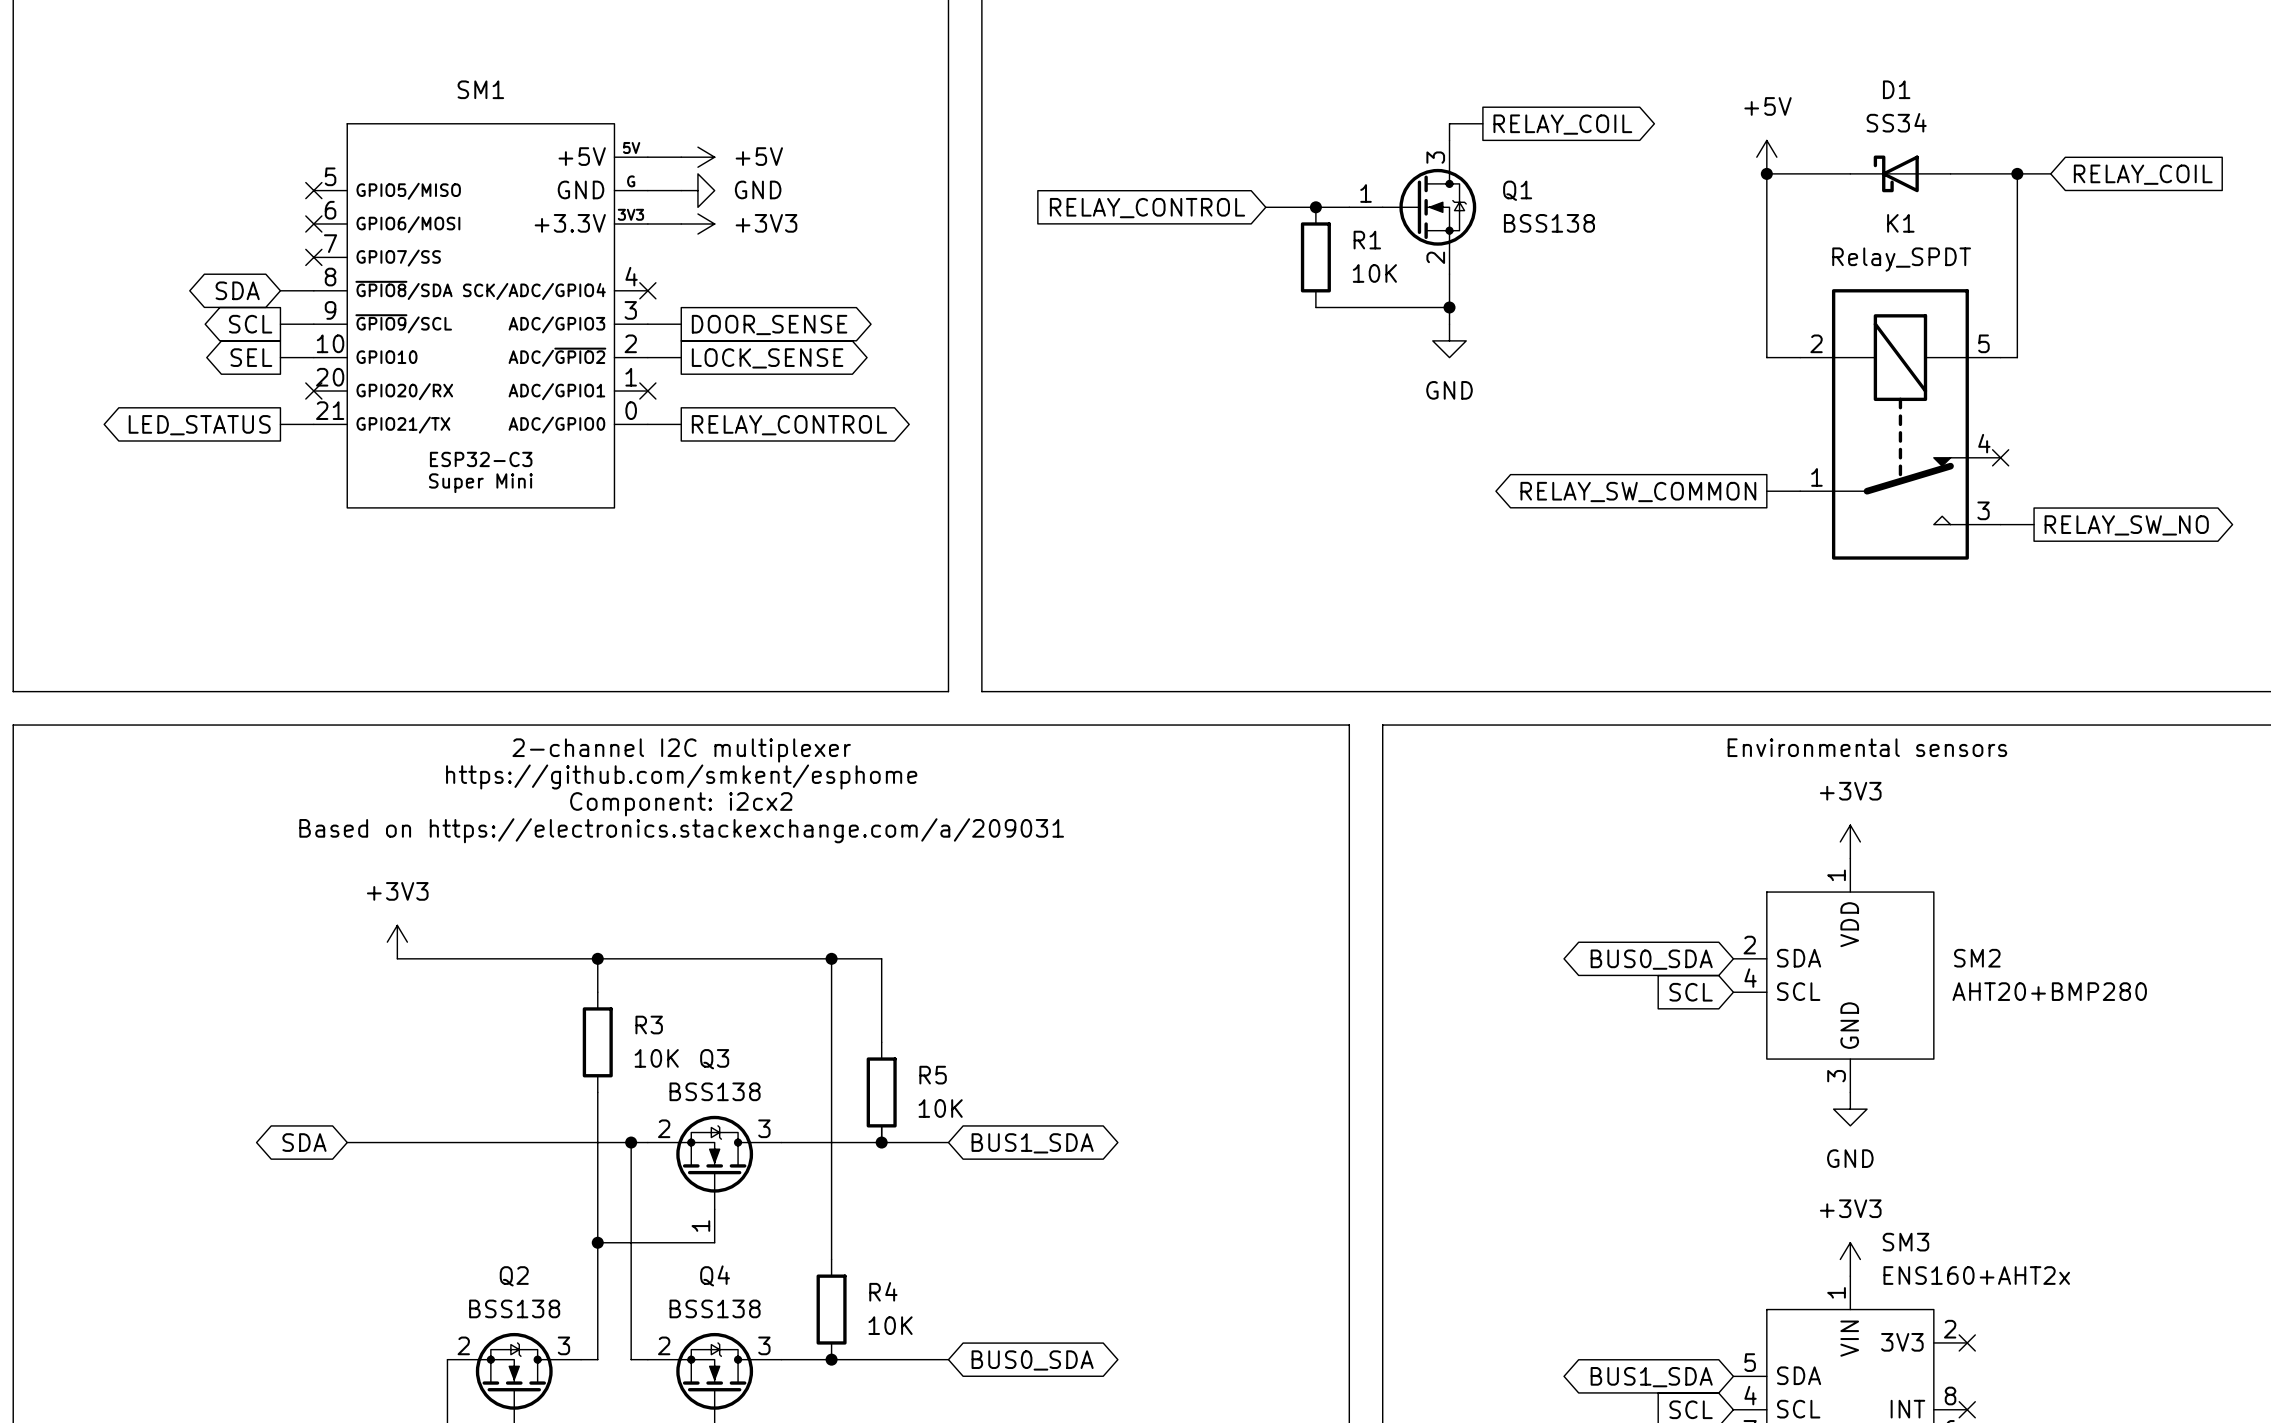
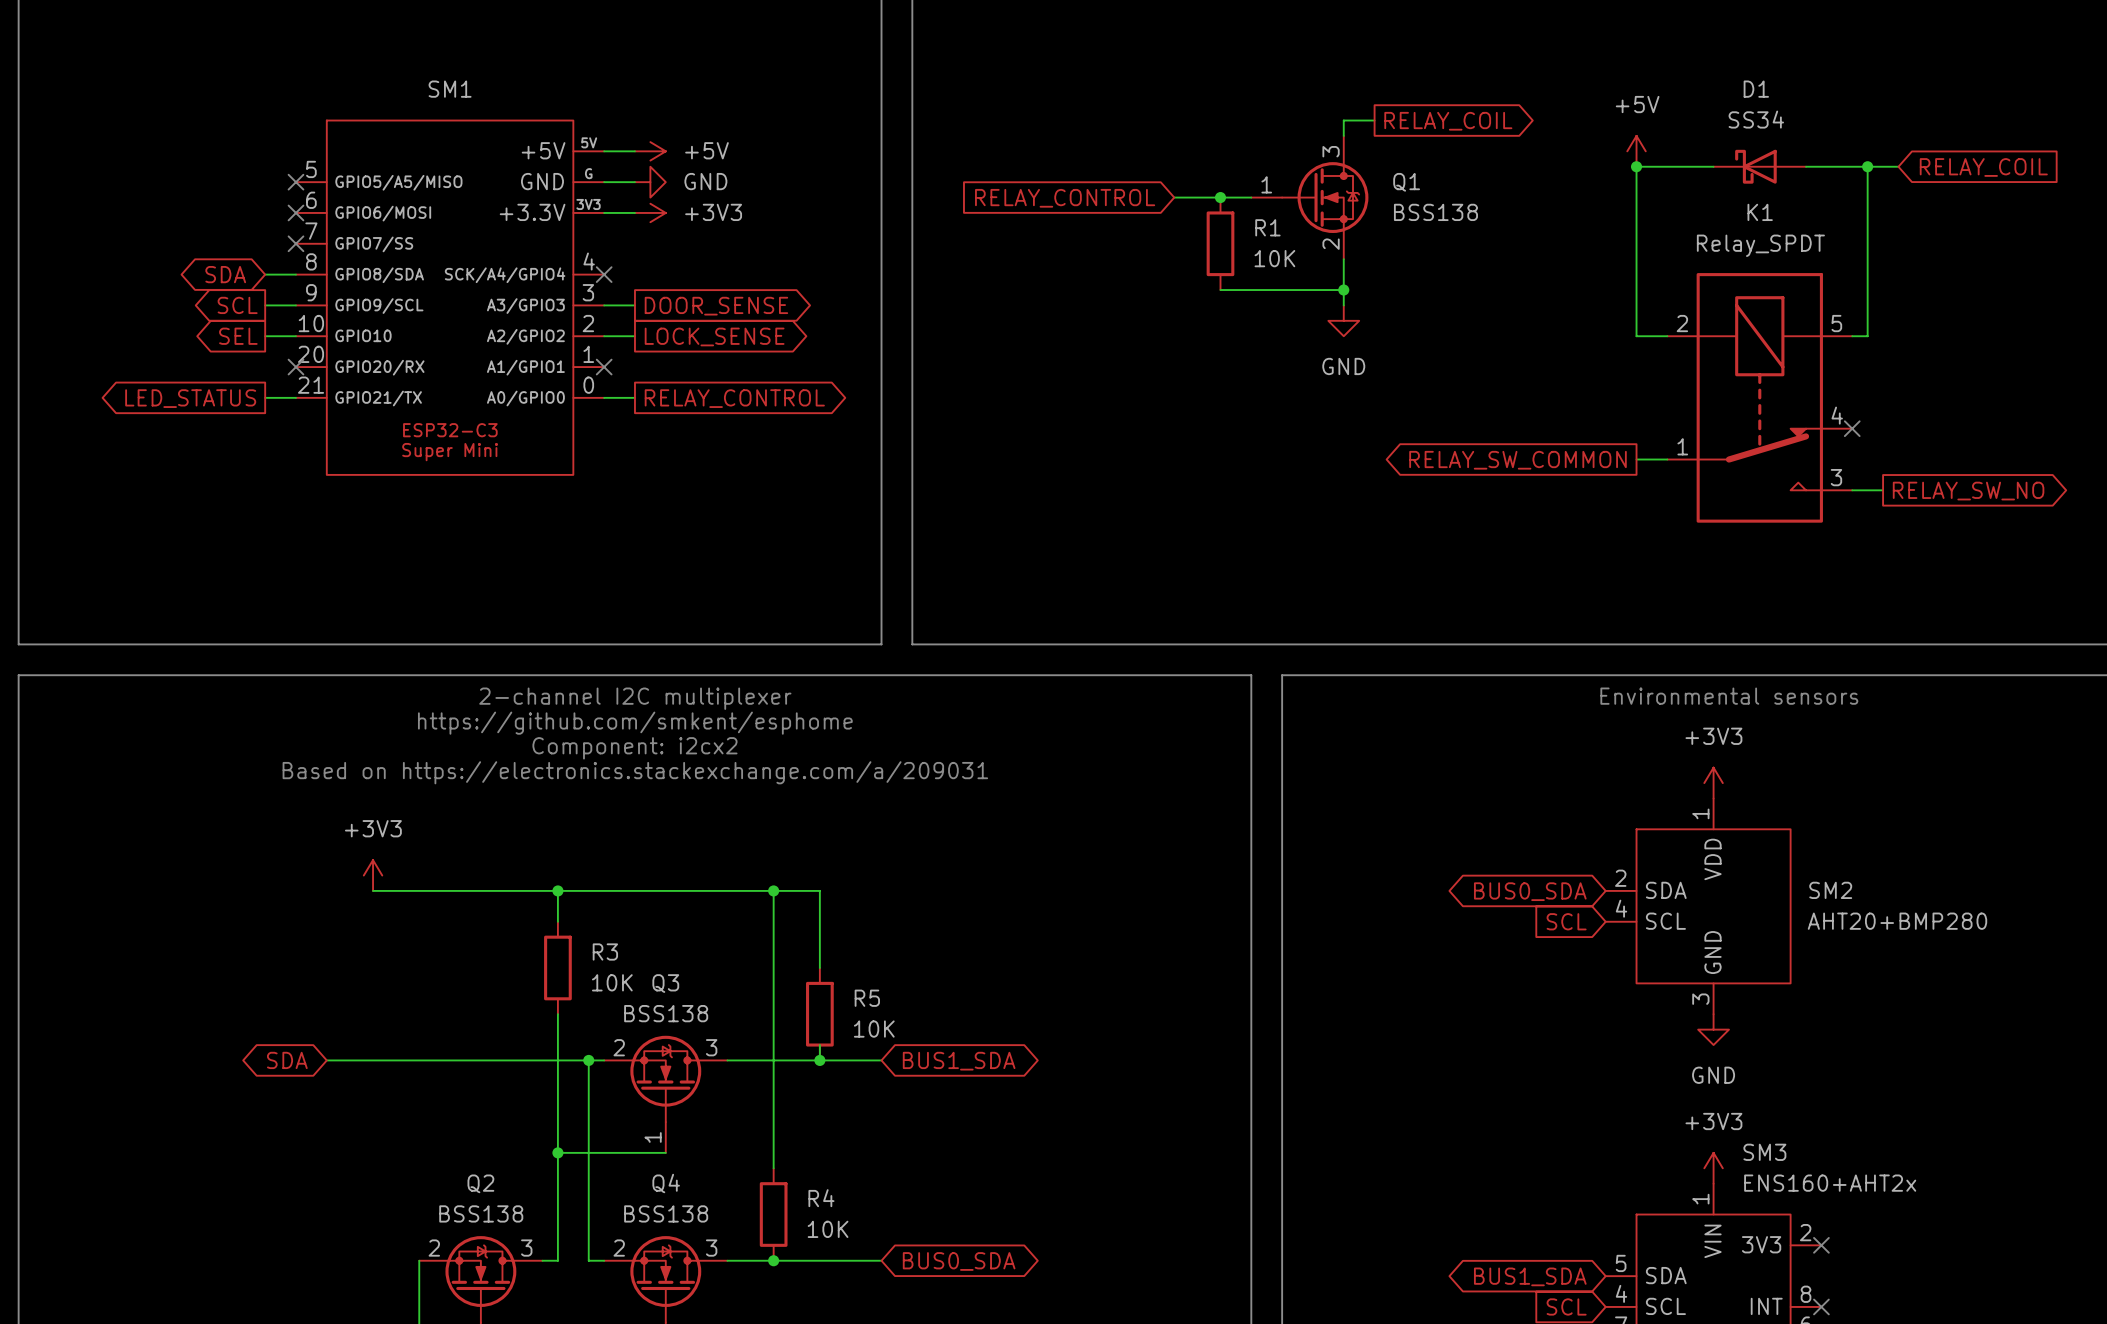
SM1 pin name: GPIO5/MISO (408, 191) -> GPIO5/A5/MISO (398, 182)
SM1 pin name: ~{GPIO8}/SDA (403, 290) -> GPIO8/SDA (379, 275)
SM1 pin name: SCK/ADC/GPIO4 (534, 291) -> SCK/A4/GPIO4 (505, 275)
SM1 pin name: ~{GPIO9}/SCL (403, 323) -> GPIO9/SCL (379, 306)
SM1 pin name: ADC/GPIO3 (556, 324) -> A3/GPIO3 (525, 306)
SM1 pin name: ADC/~{GPIO2} (557, 357) -> A2/GPIO2 (525, 336)
SM1 pin name: ADC/GPIO1 (556, 391) -> A1/GPIO1 (525, 367)
SM1 pin name: ADC/GPIO0 (556, 425) -> A0/GPIO0 (525, 398)

